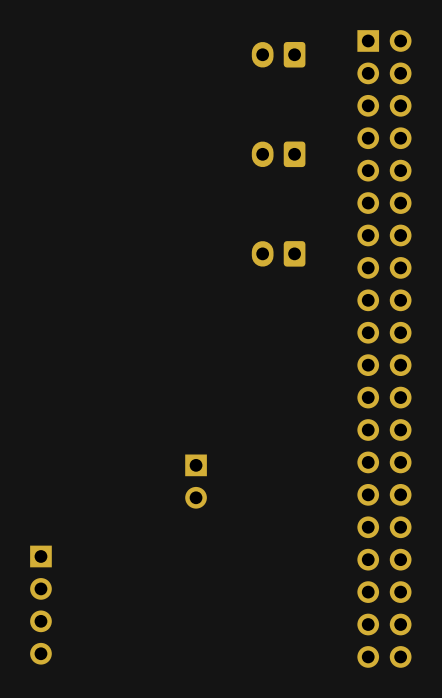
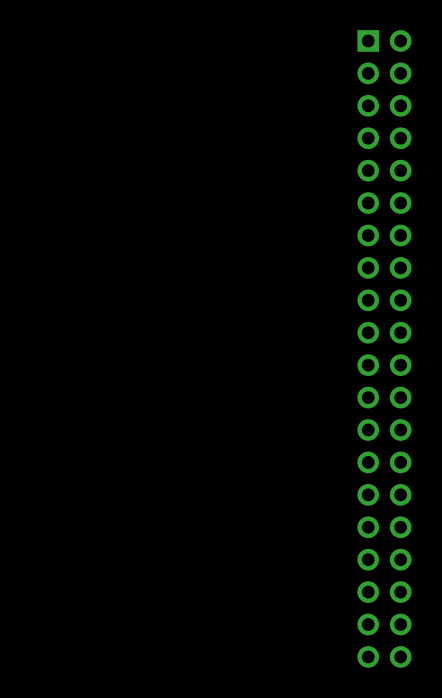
part: (278, 54) -> none
part: (278, 154) -> none
part: (278, 253) -> none
part: (196, 481) -> none
part: (40, 605) -> none

